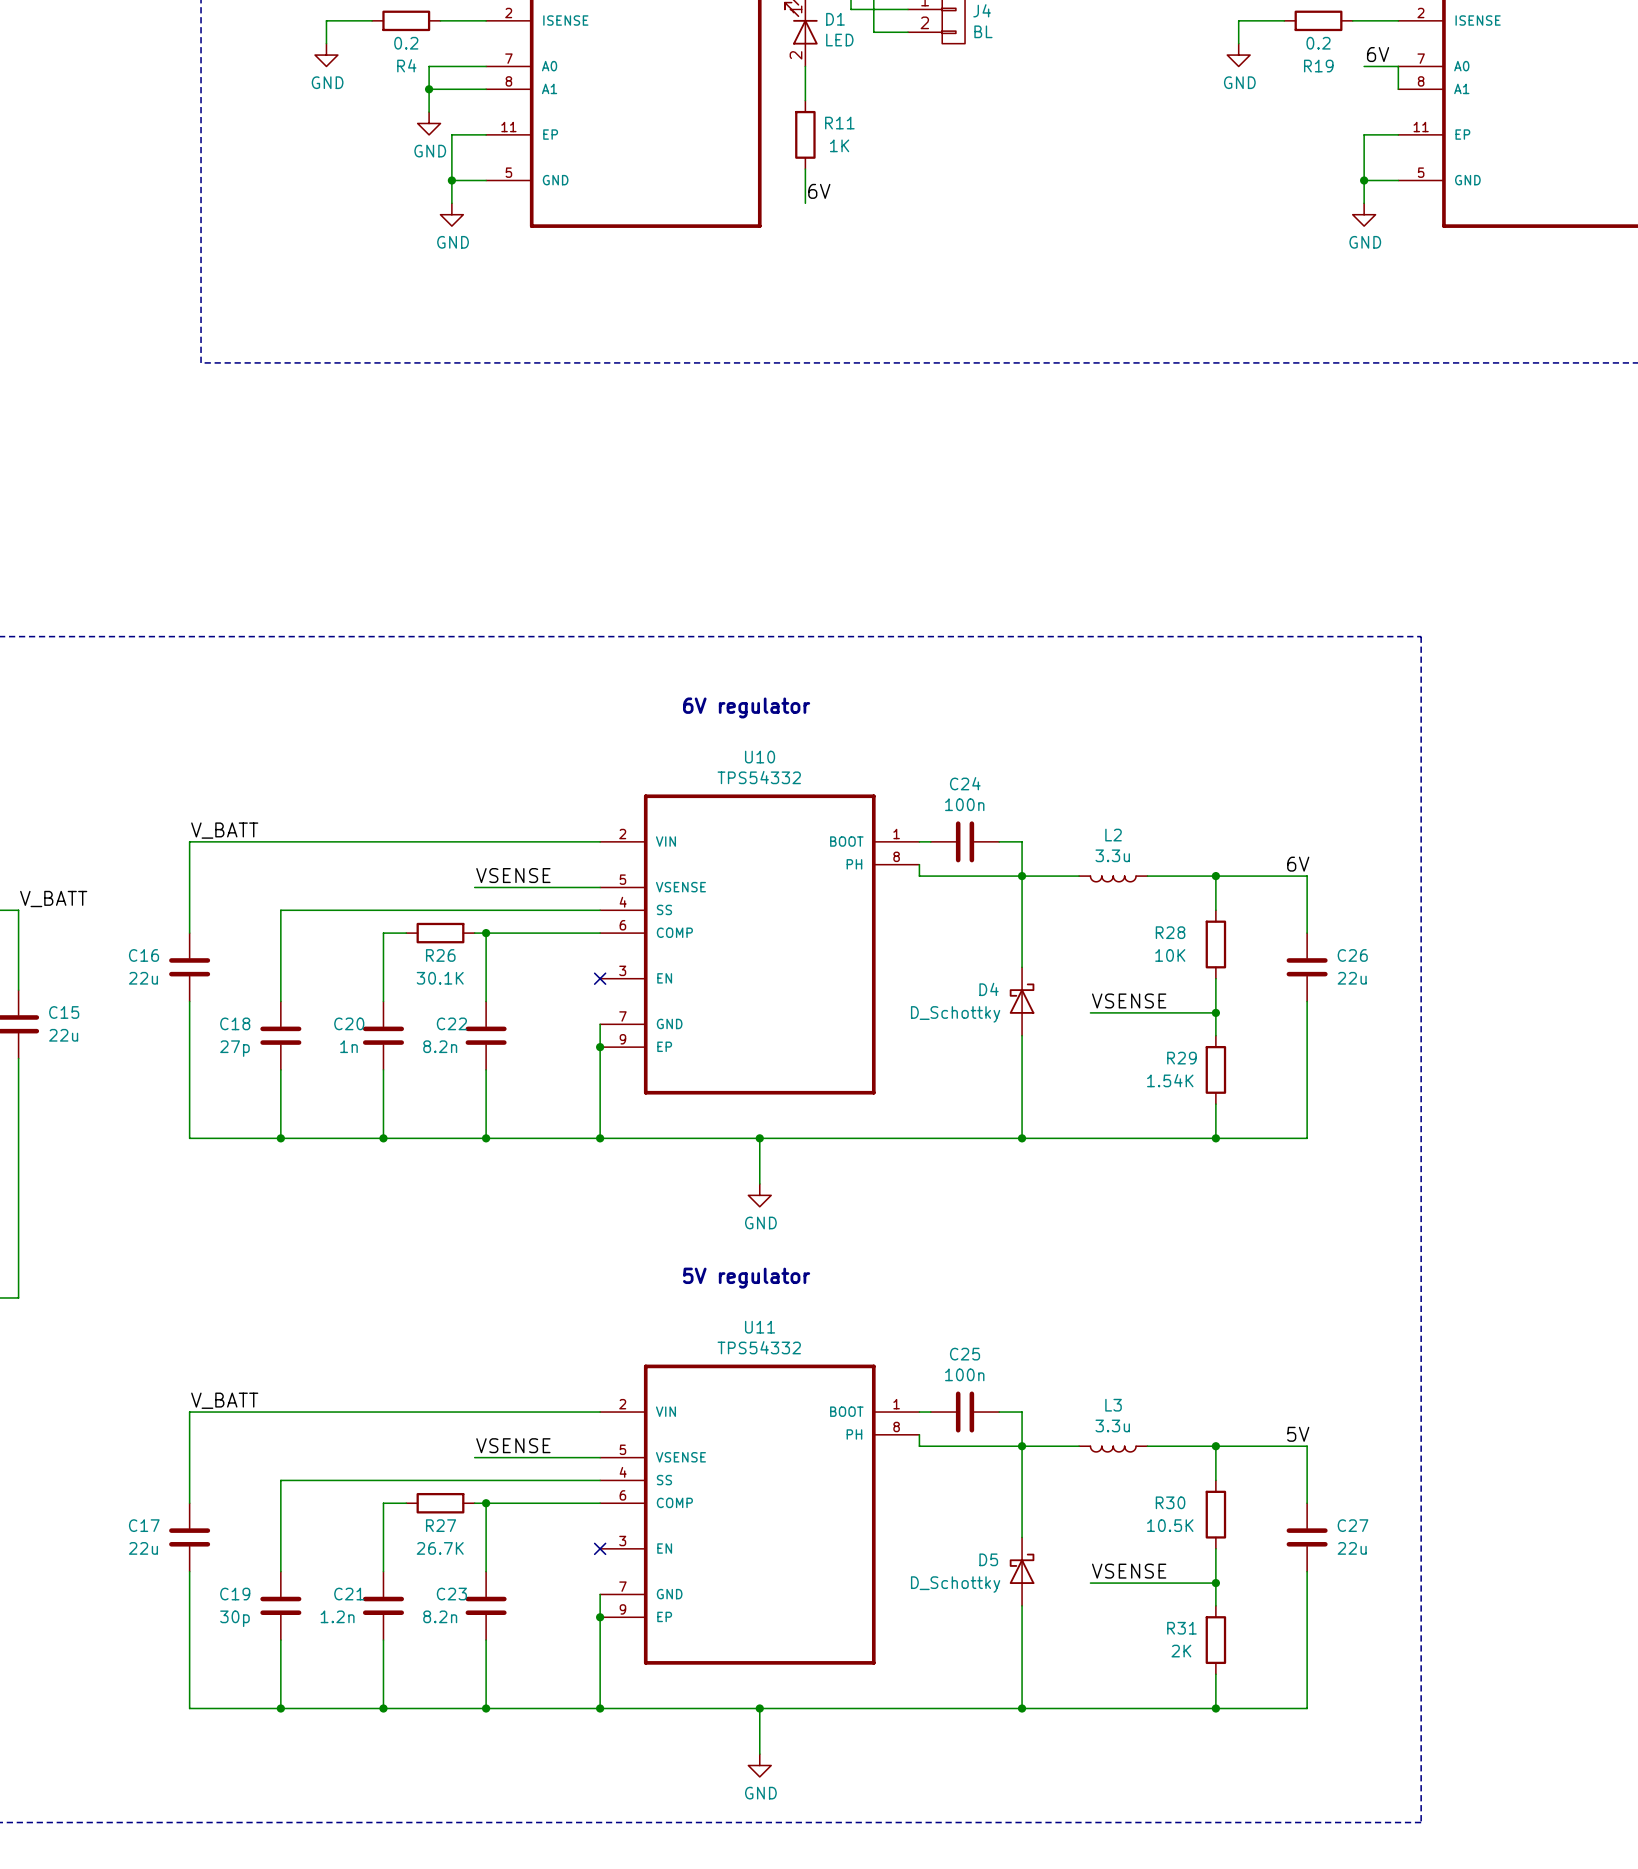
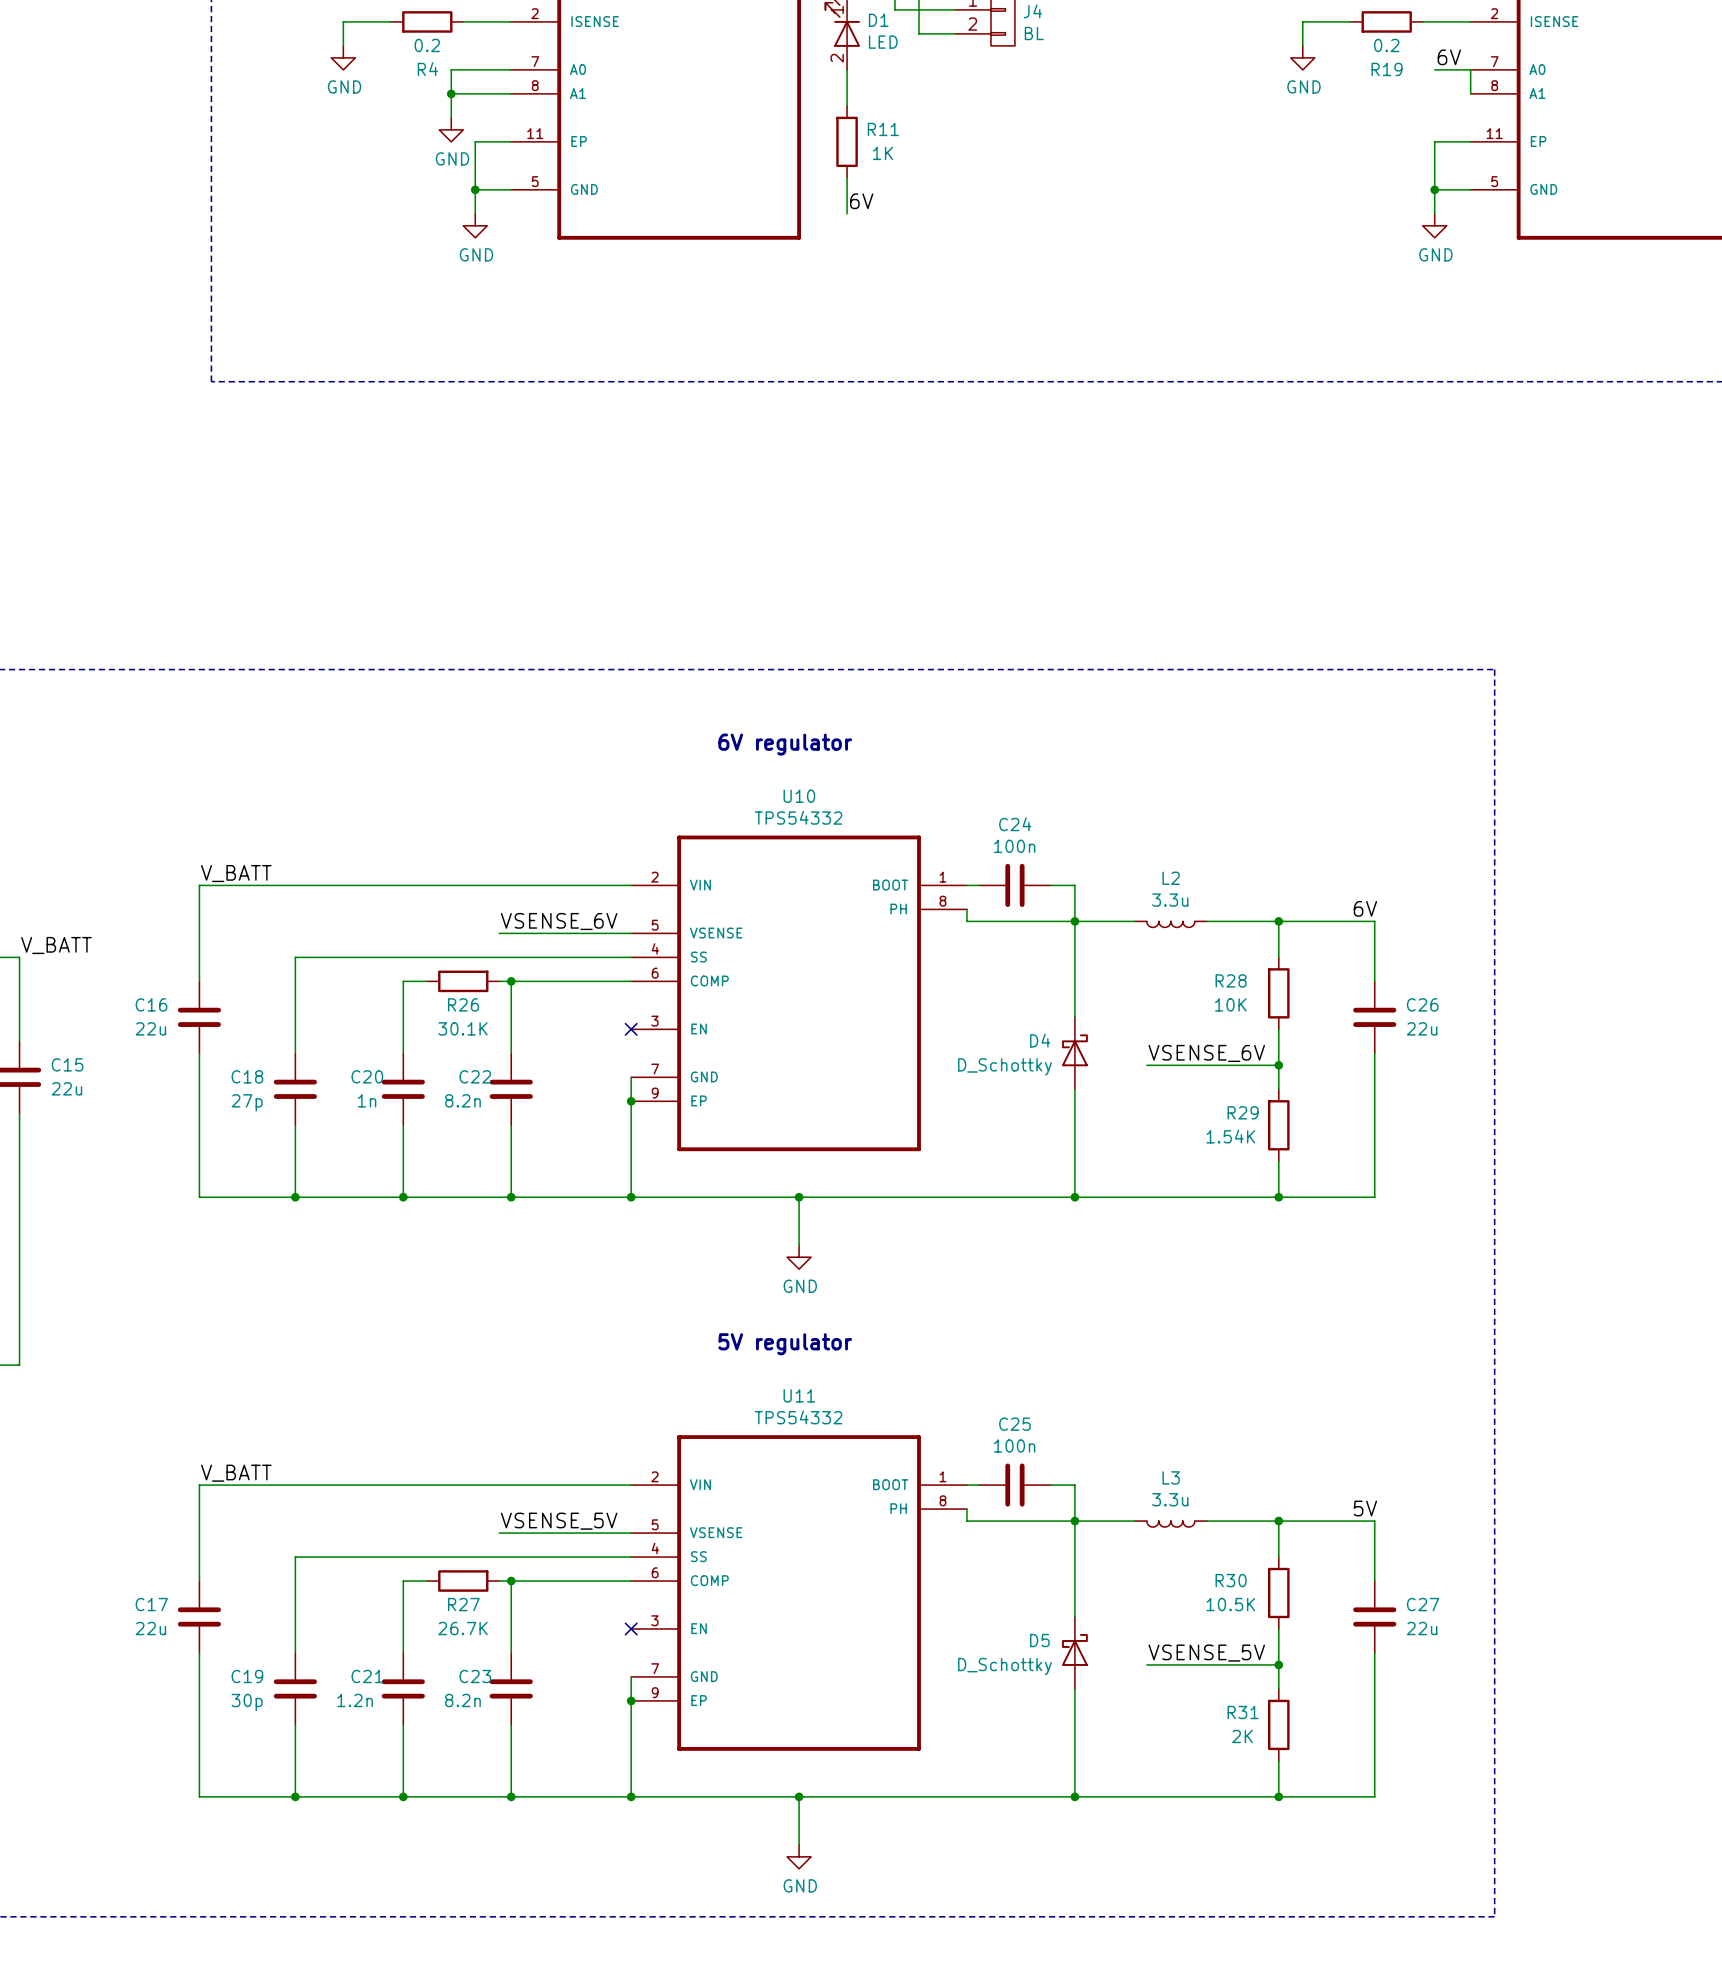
label: VSENSE (513, 875) -> VSENSE_6V (559, 921)
label: VSENSE (1129, 1000) -> VSENSE_6V (1206, 1053)
label: VSENSE (513, 1445) -> VSENSE_5V (559, 1521)
label: VSENSE (1129, 1571) -> VSENSE_5V (1206, 1653)

